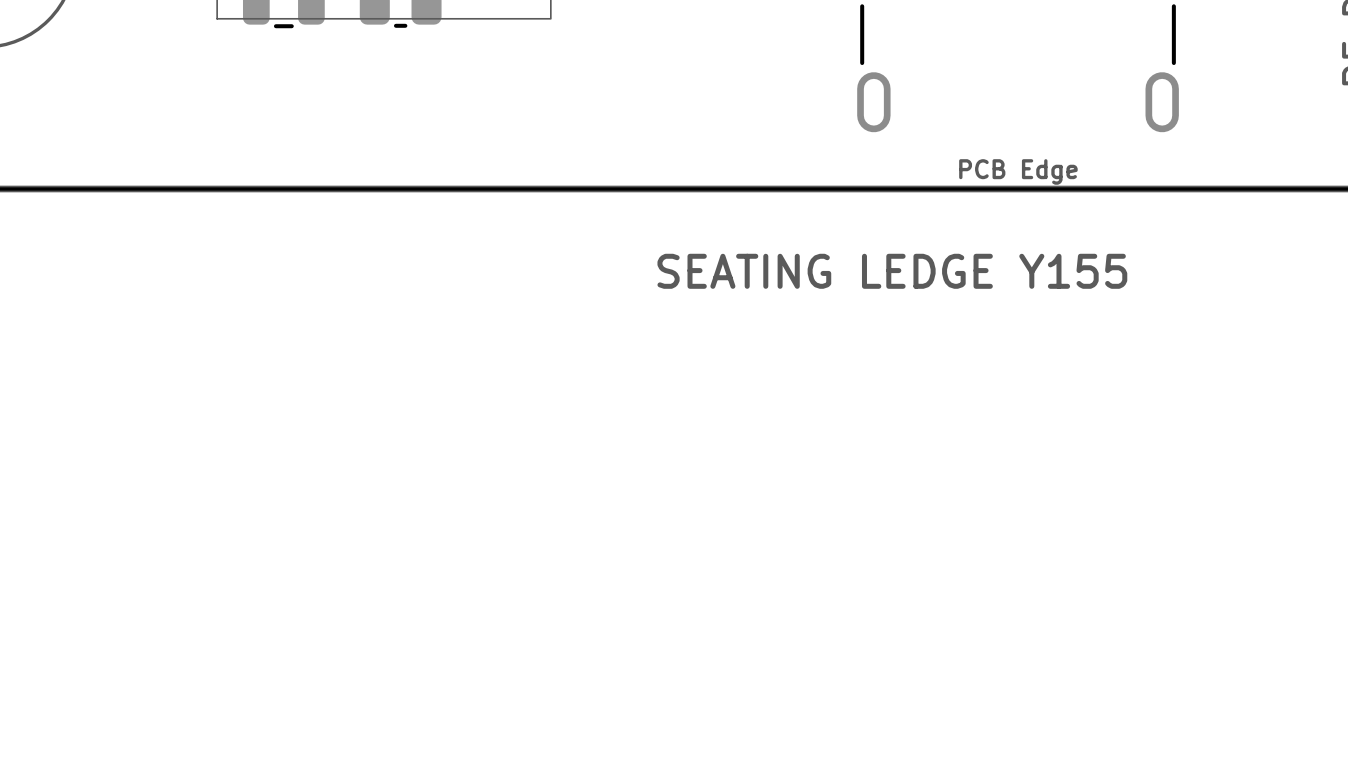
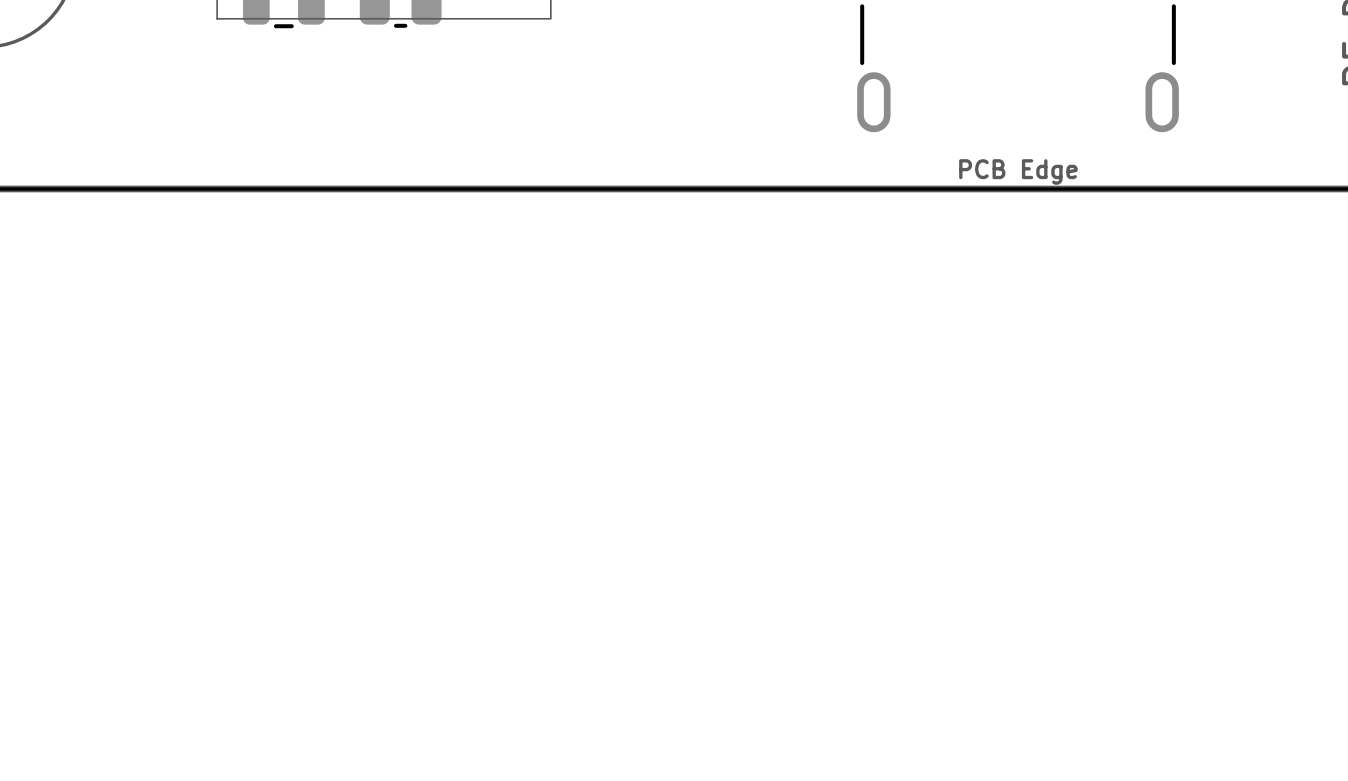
text: SEATING LEDGE Y155 (892, 271) -> none

